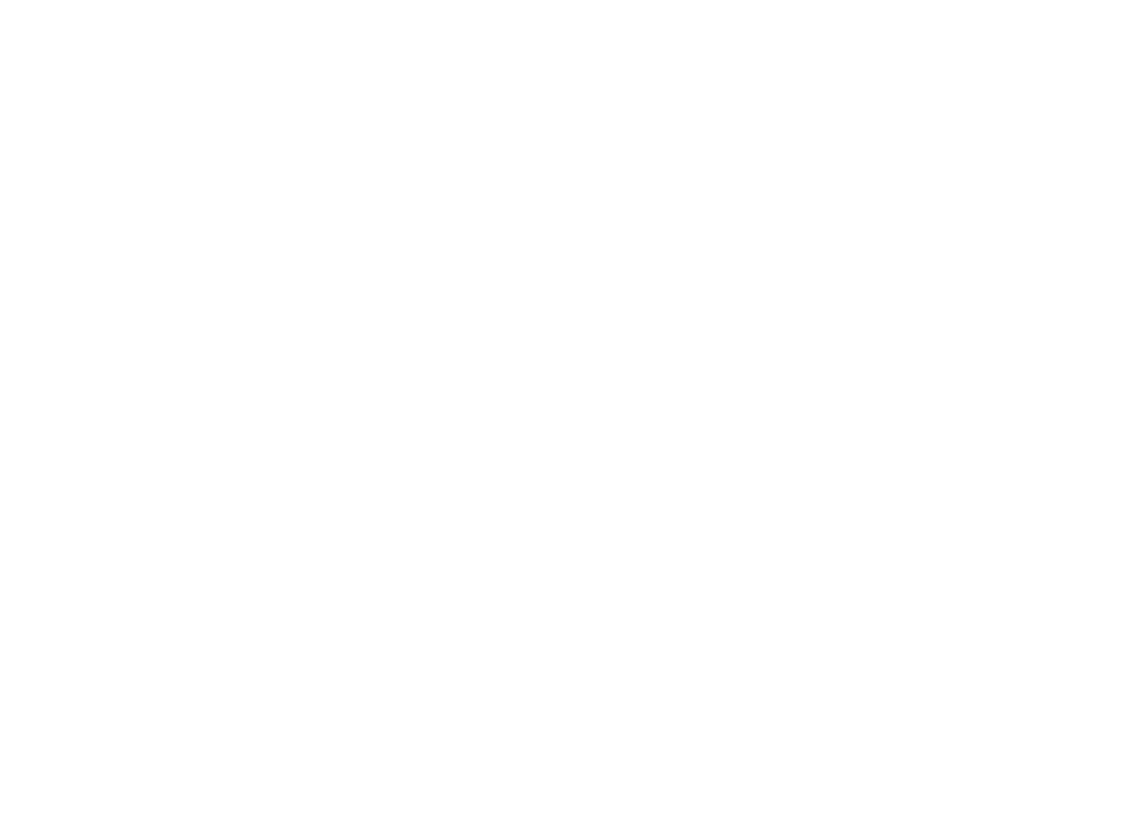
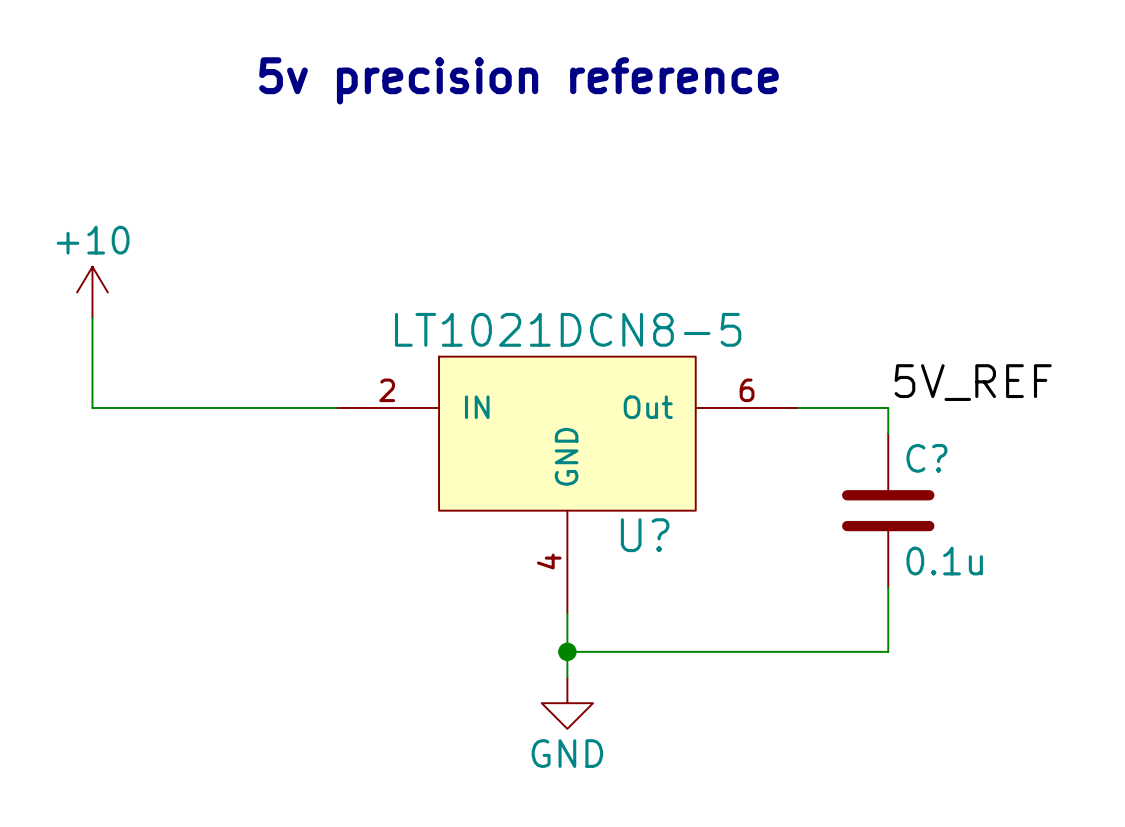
text: none -> 5v precision reference (518, 80)
power symbol: none -> +10 (92, 292)
wire: none -> (92, 318) (92, 407) (336, 407)
label: none -> 5V_REF (973, 382)
wire: none -> (798, 407) (888, 407) (888, 433)
U?: none -> LT1021DCN8-5 (567, 485)
C?: none -> 0.1u (888, 510)
wire: none -> (888, 587) (888, 651) (567, 651)
wire: none -> (567, 613) (567, 677)
junction: none -> (567, 651)
power symbol: none -> GND (567, 703)

